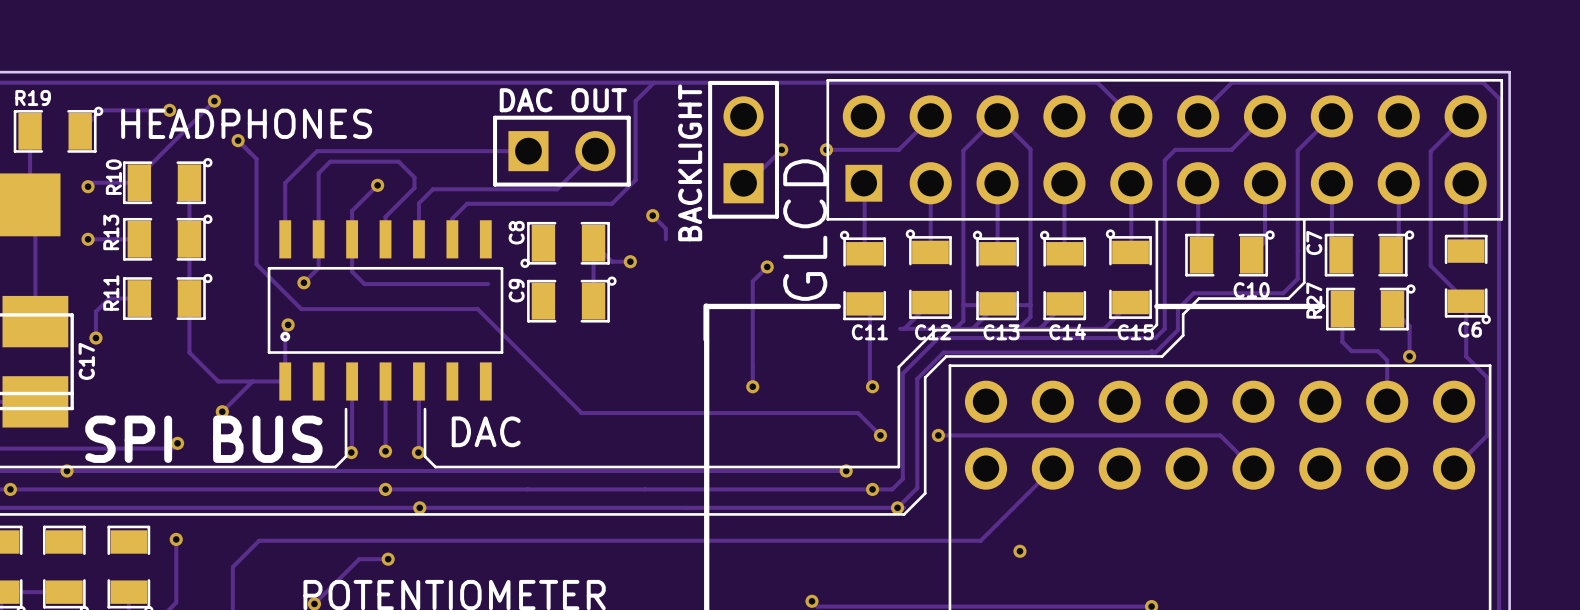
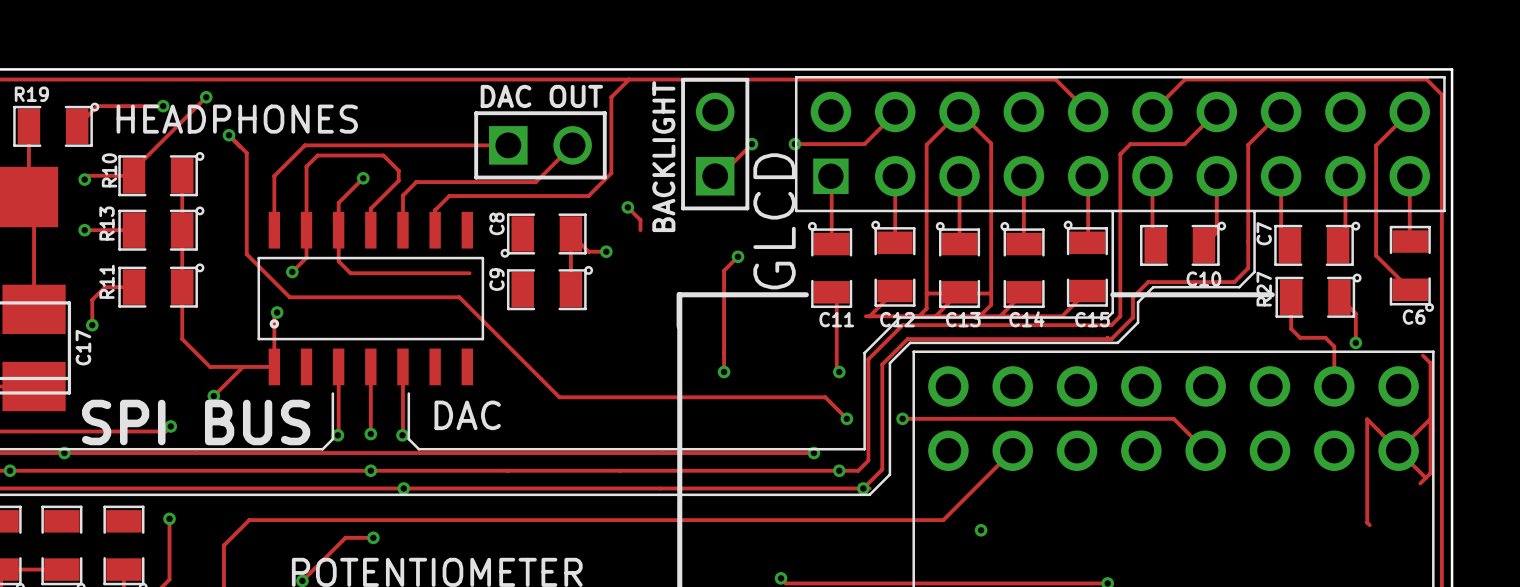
track: (1466, 301) (1466, 356) (1479, 369) -> none
track: none -> (1430, 418) (1430, 473) (1420, 483)
track: none -> (1425, 477) (1367, 419) (1367, 522) (1369, 525)

